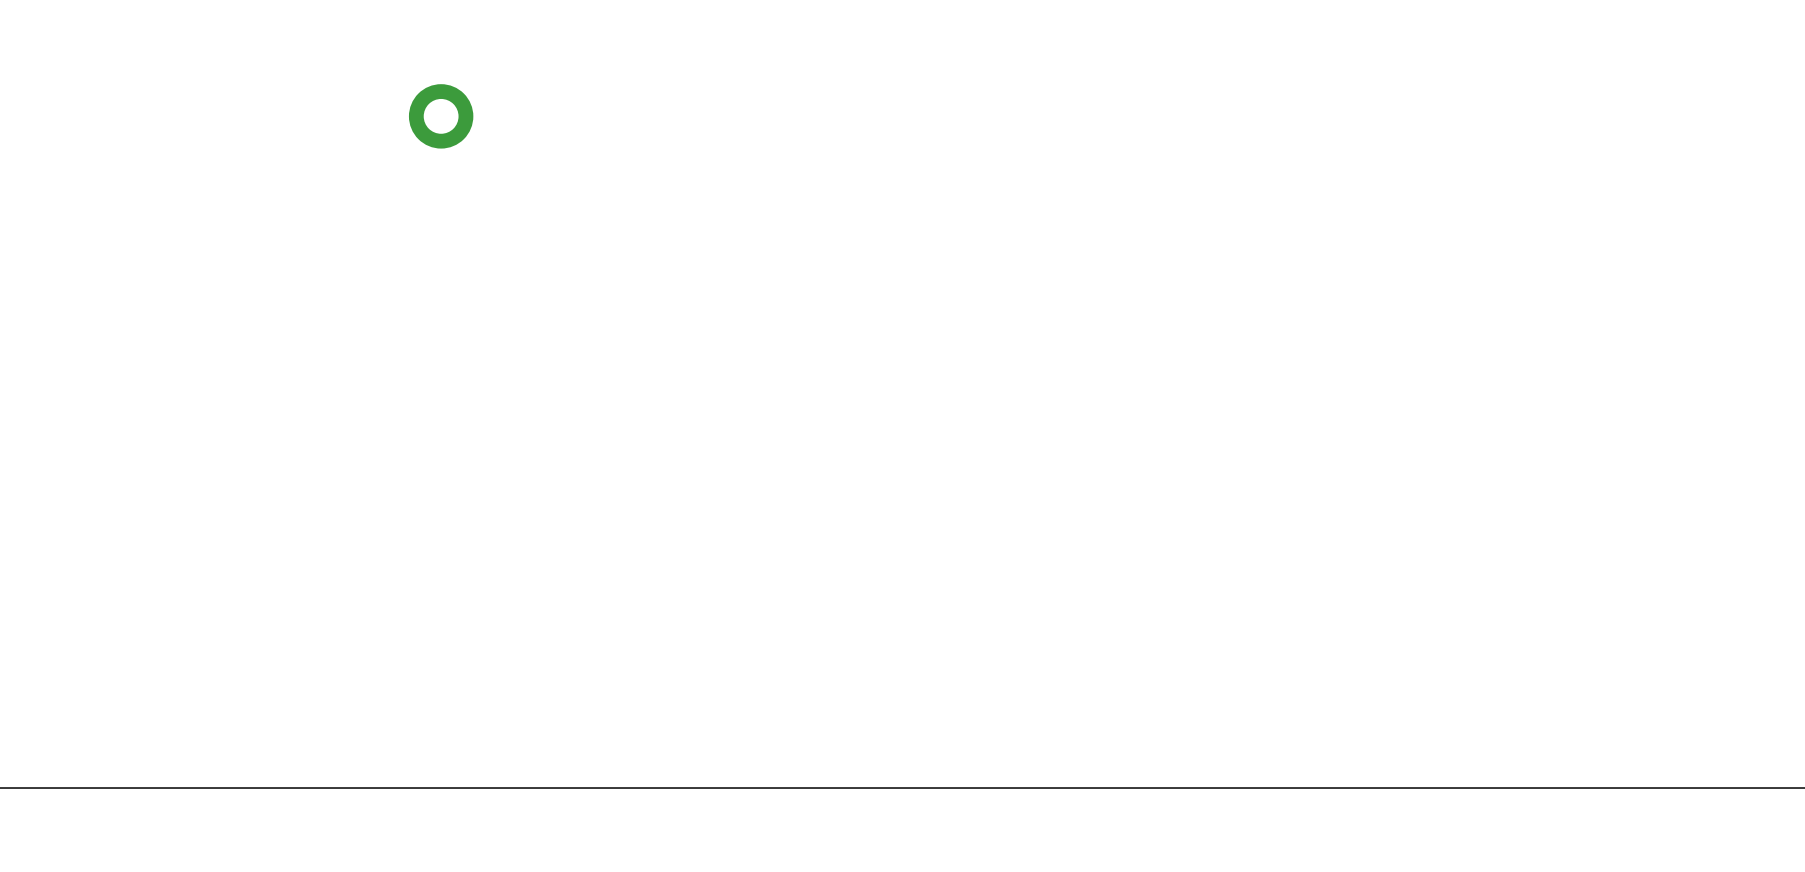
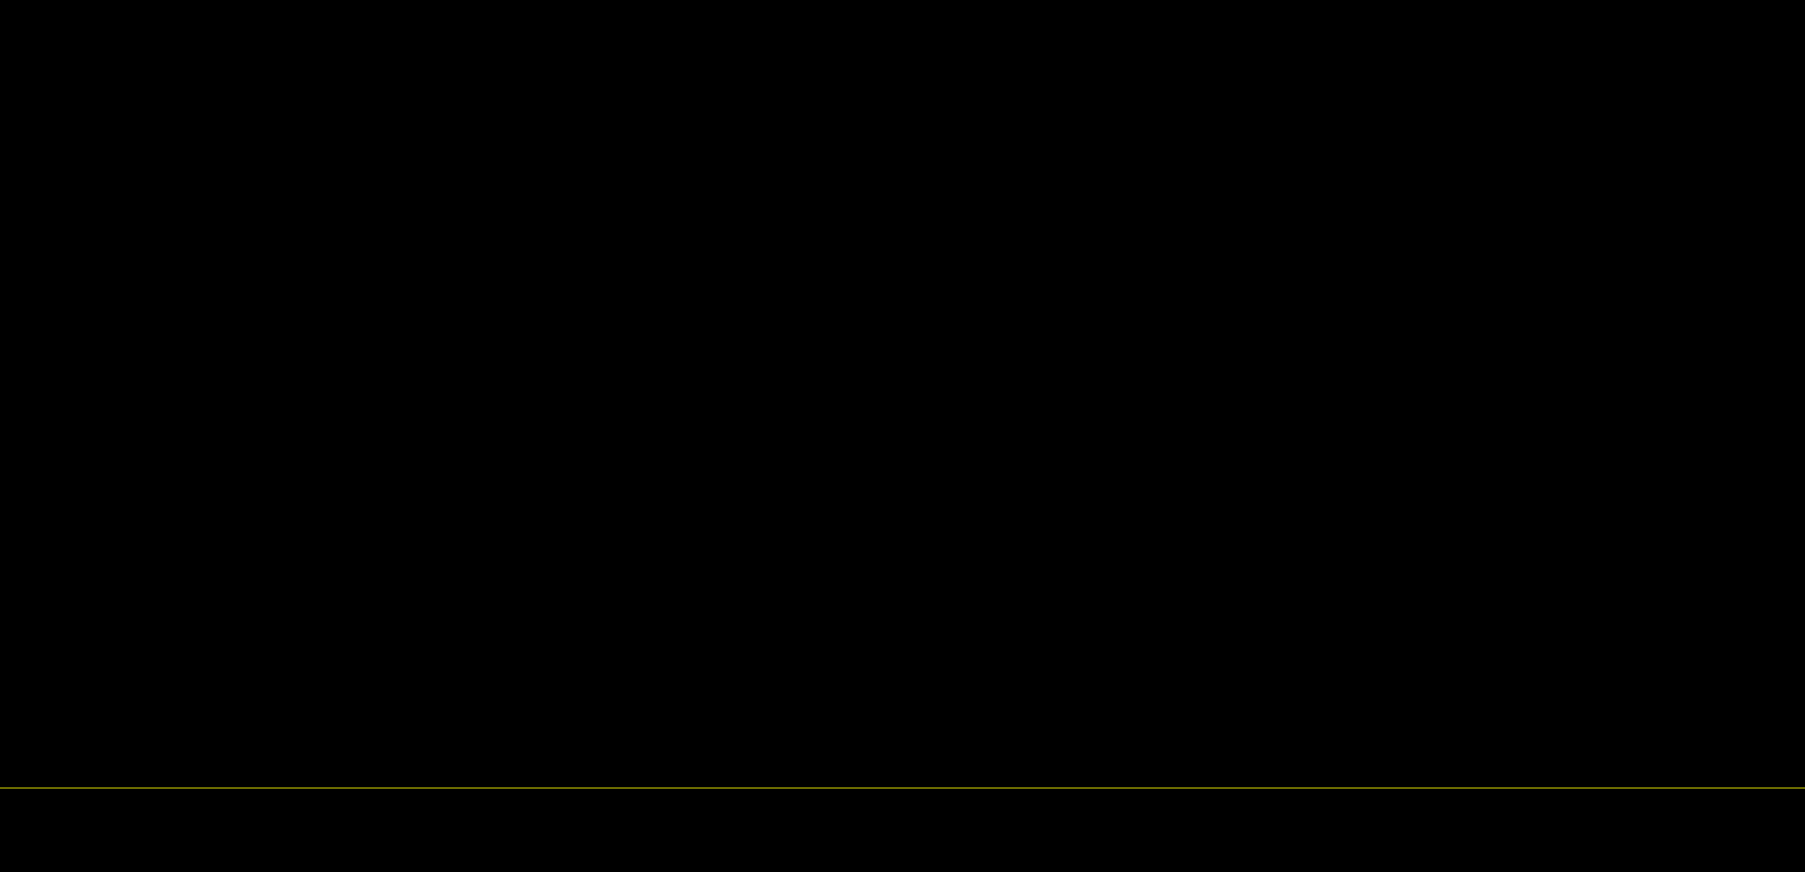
part: (441, 116) -> none

